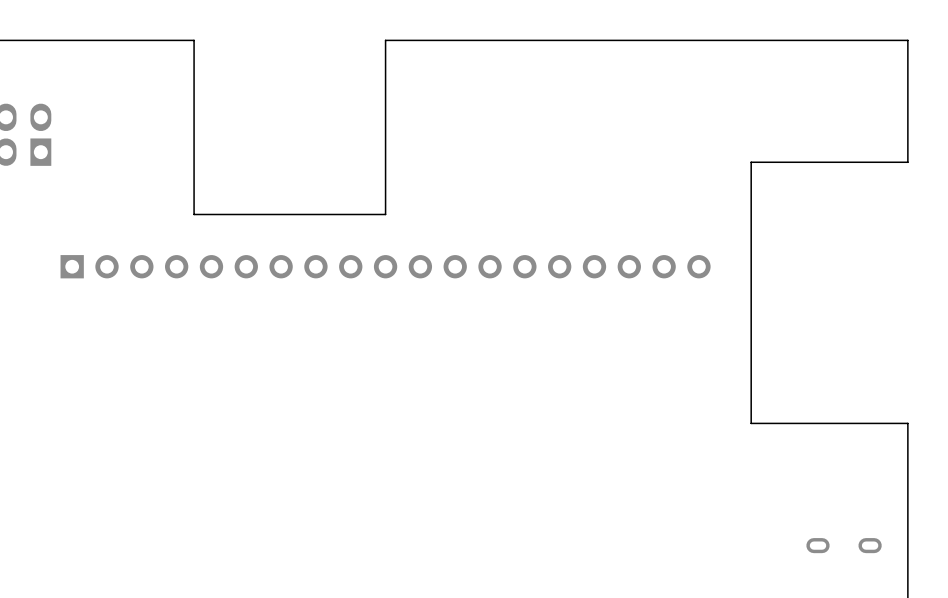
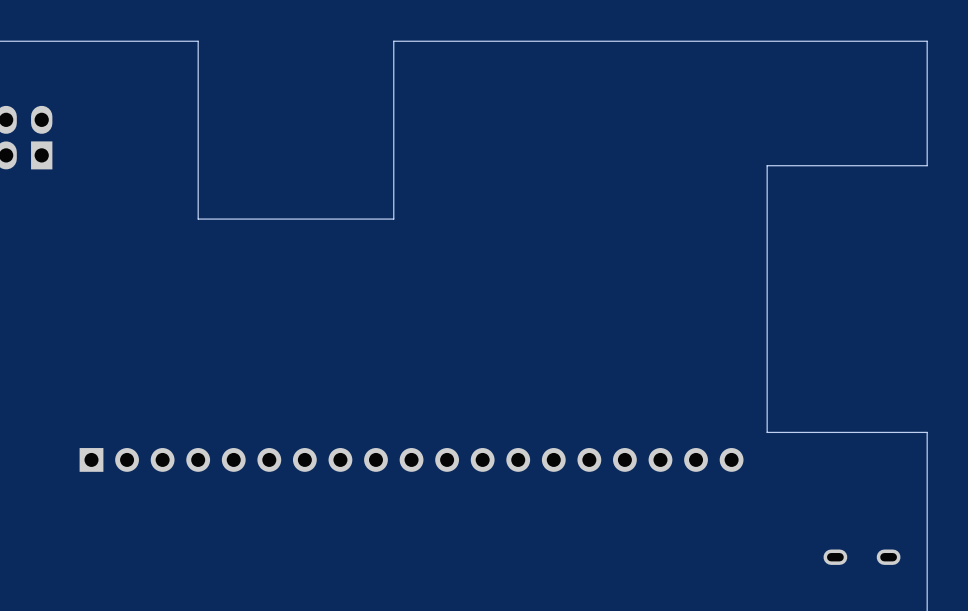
part: (385, 266) -> none
part: none -> (411, 459)

